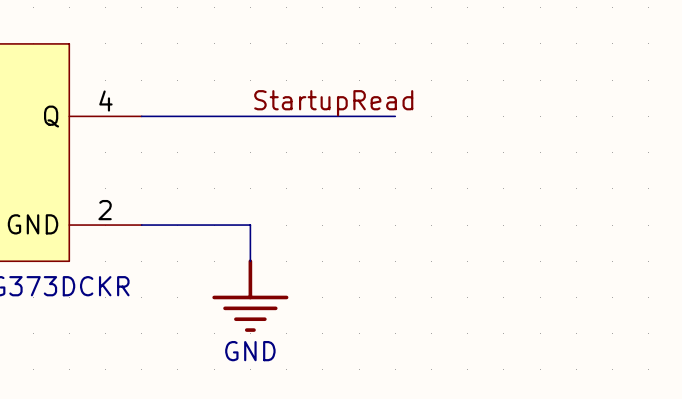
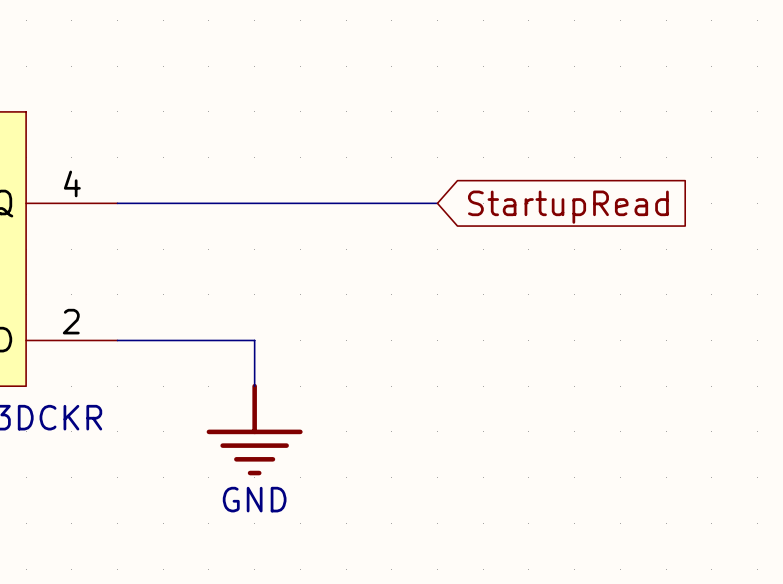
label: StartupRead (333, 103) -> none
global label: none -> StartupRead (568, 207)

